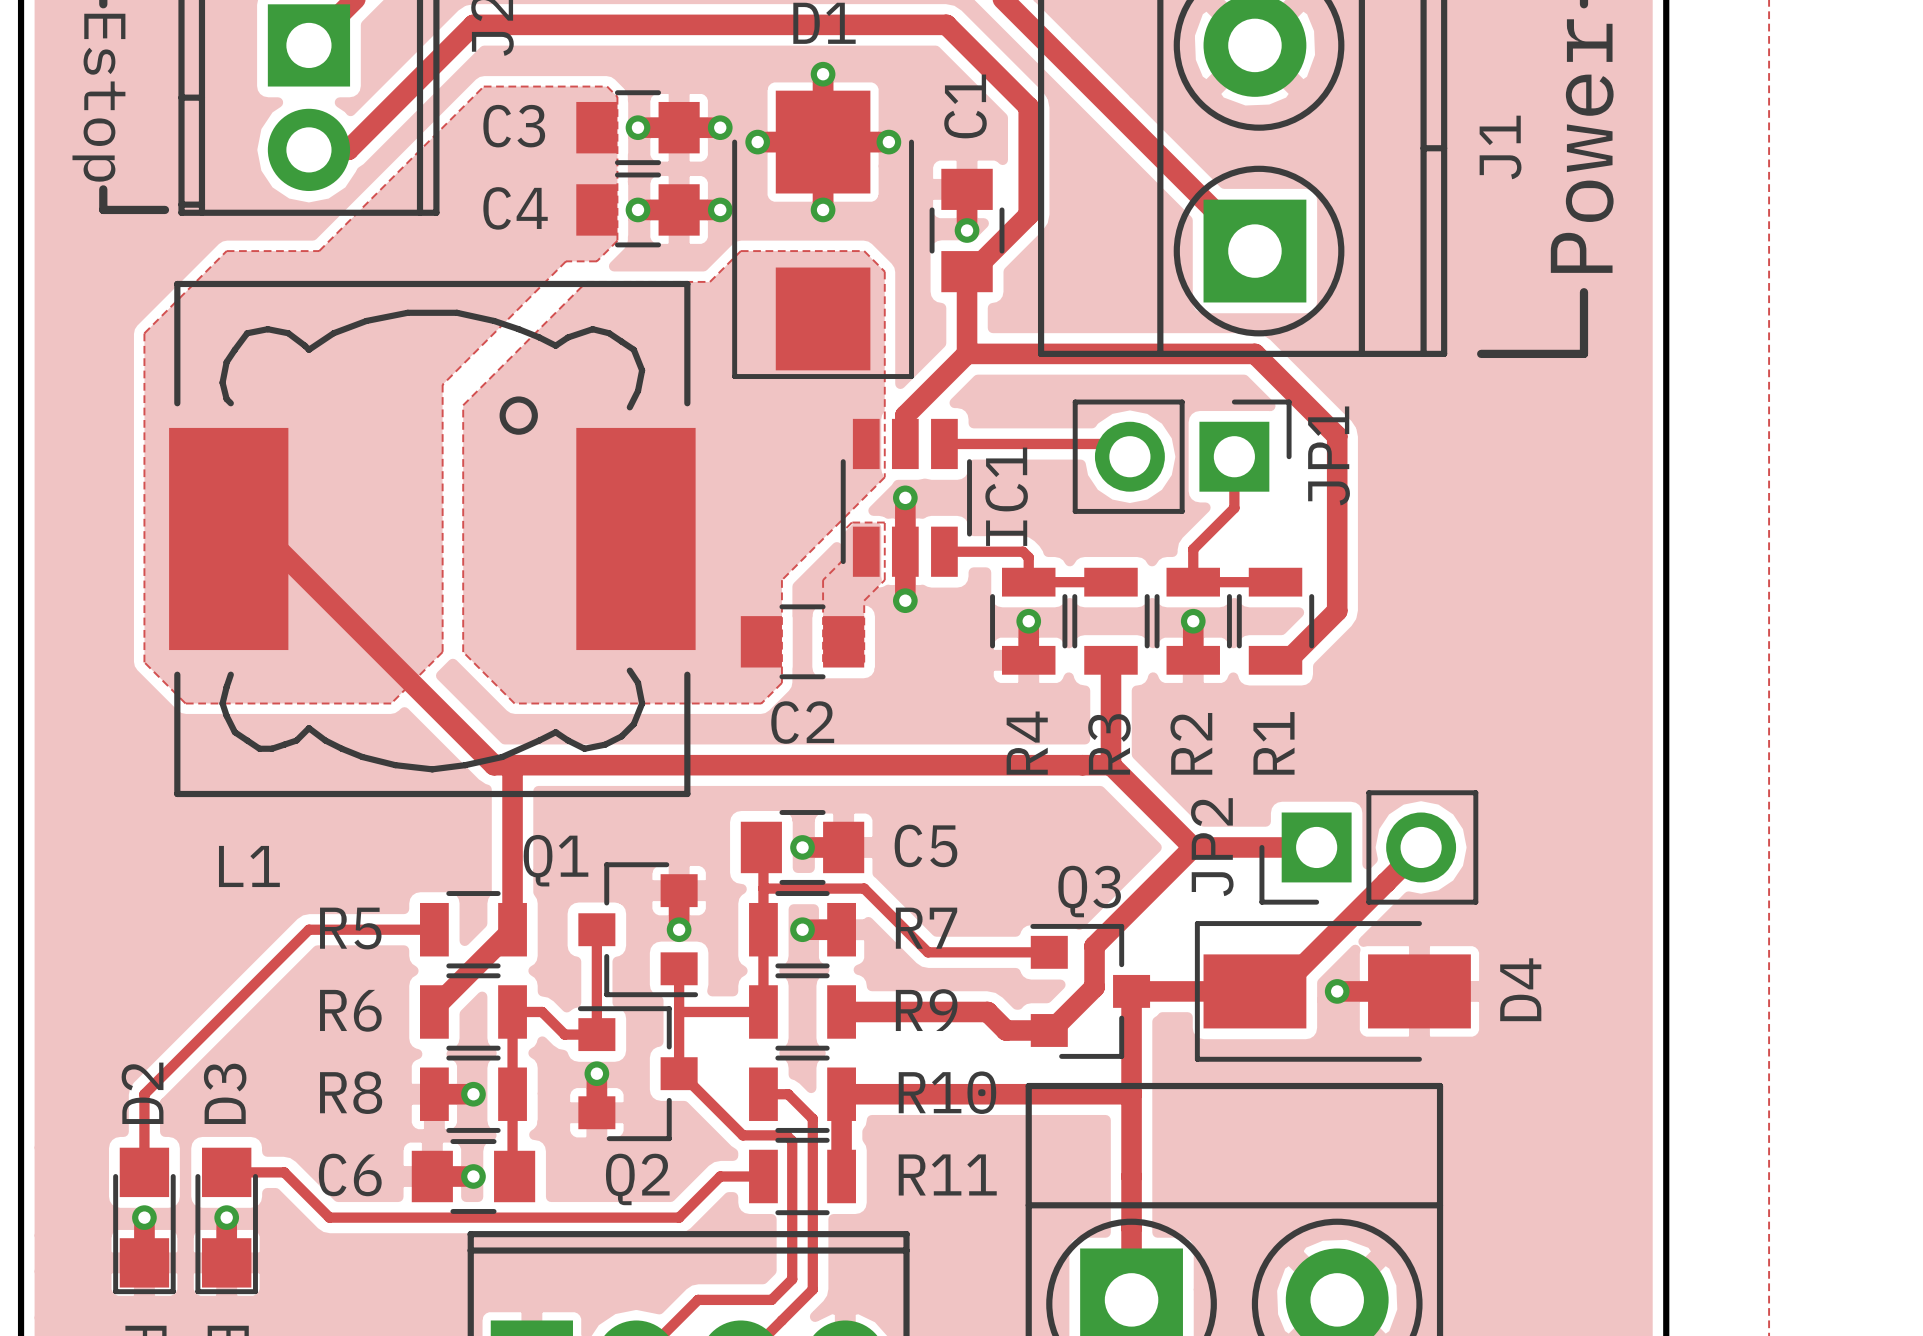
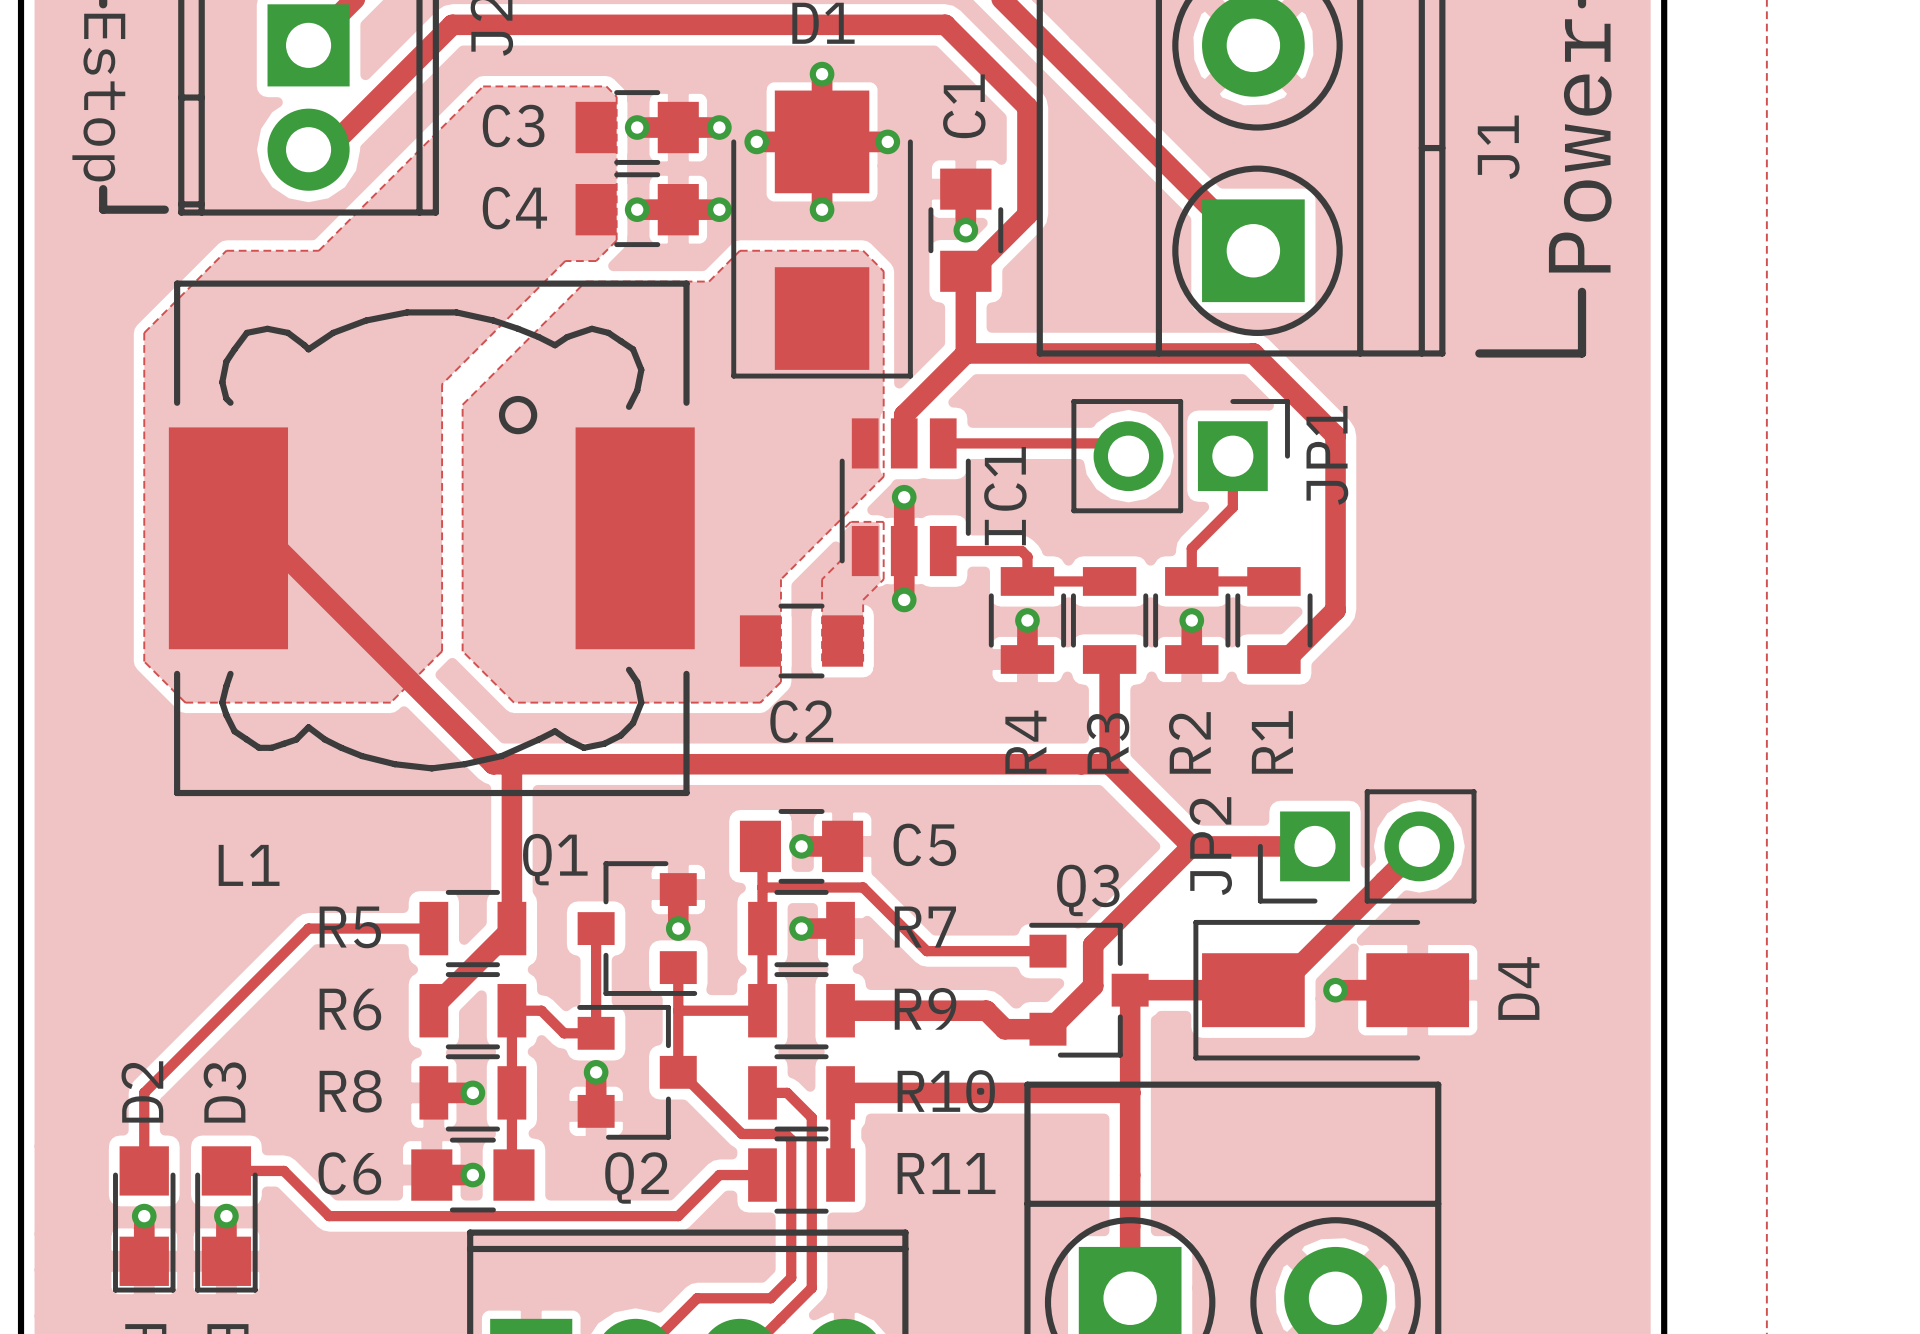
track: (473, 24) (348, 149) (327, 149) -> (472, 24) (452, 24) (327, 149)

